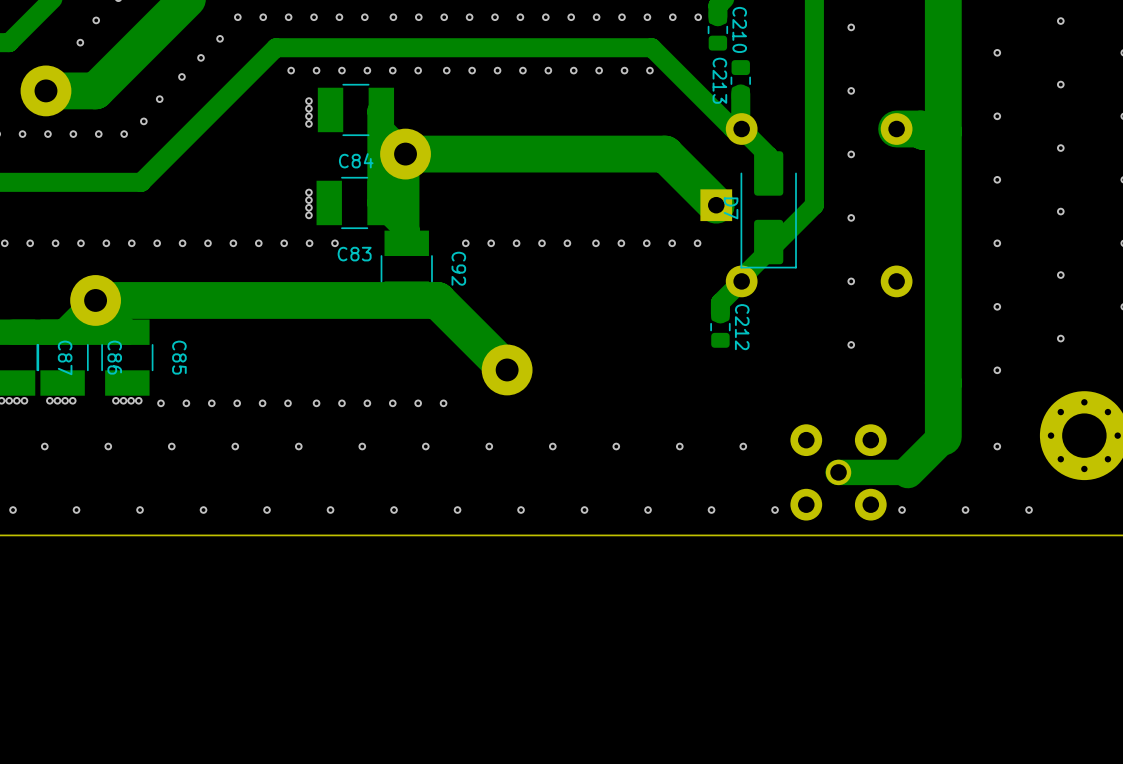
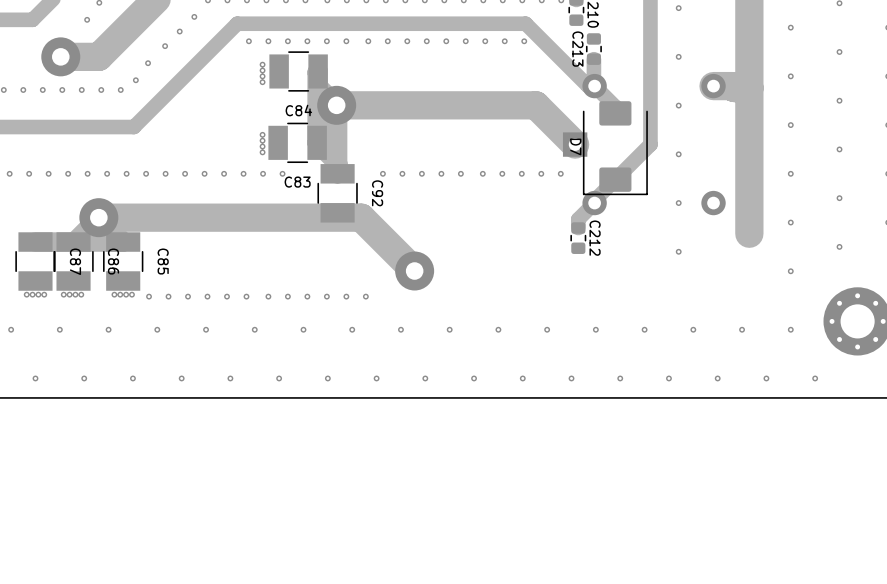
D7 footprint: [740, 151, 797, 269] -> [583, 101, 648, 195]
track: (943, 321) (943, 436) (907, 472) (838, 472) -> none
via: none -> (644, 329)
via: none -> (693, 329)
via: none -> (742, 329)
part: (838, 472) -> none
via: none -> (668, 378)

